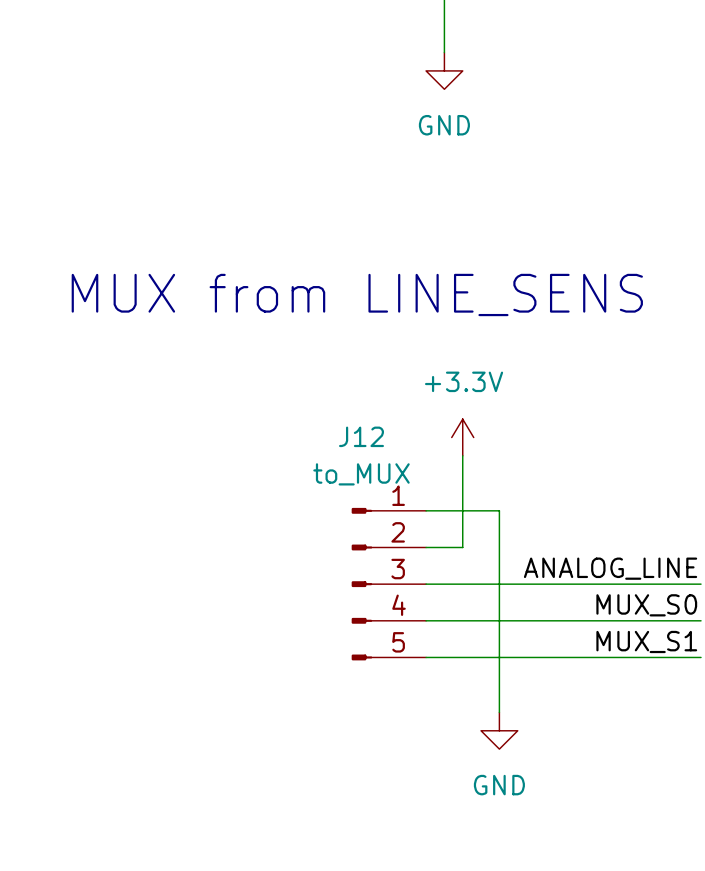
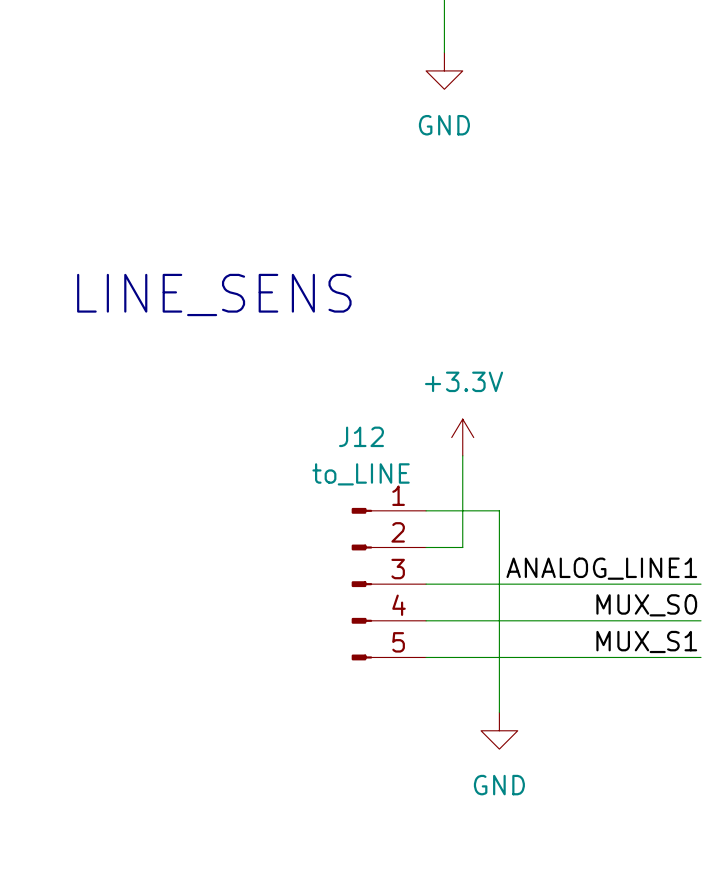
text: MUX from LINE_SENS (357, 294) -> LINE_SENS (214, 294)
J12 value: to_MUX (361, 474) -> to_LINE (361, 474)
label: ANALOG_LINE (610, 568) -> ANALOG_LINE1 (601, 568)

